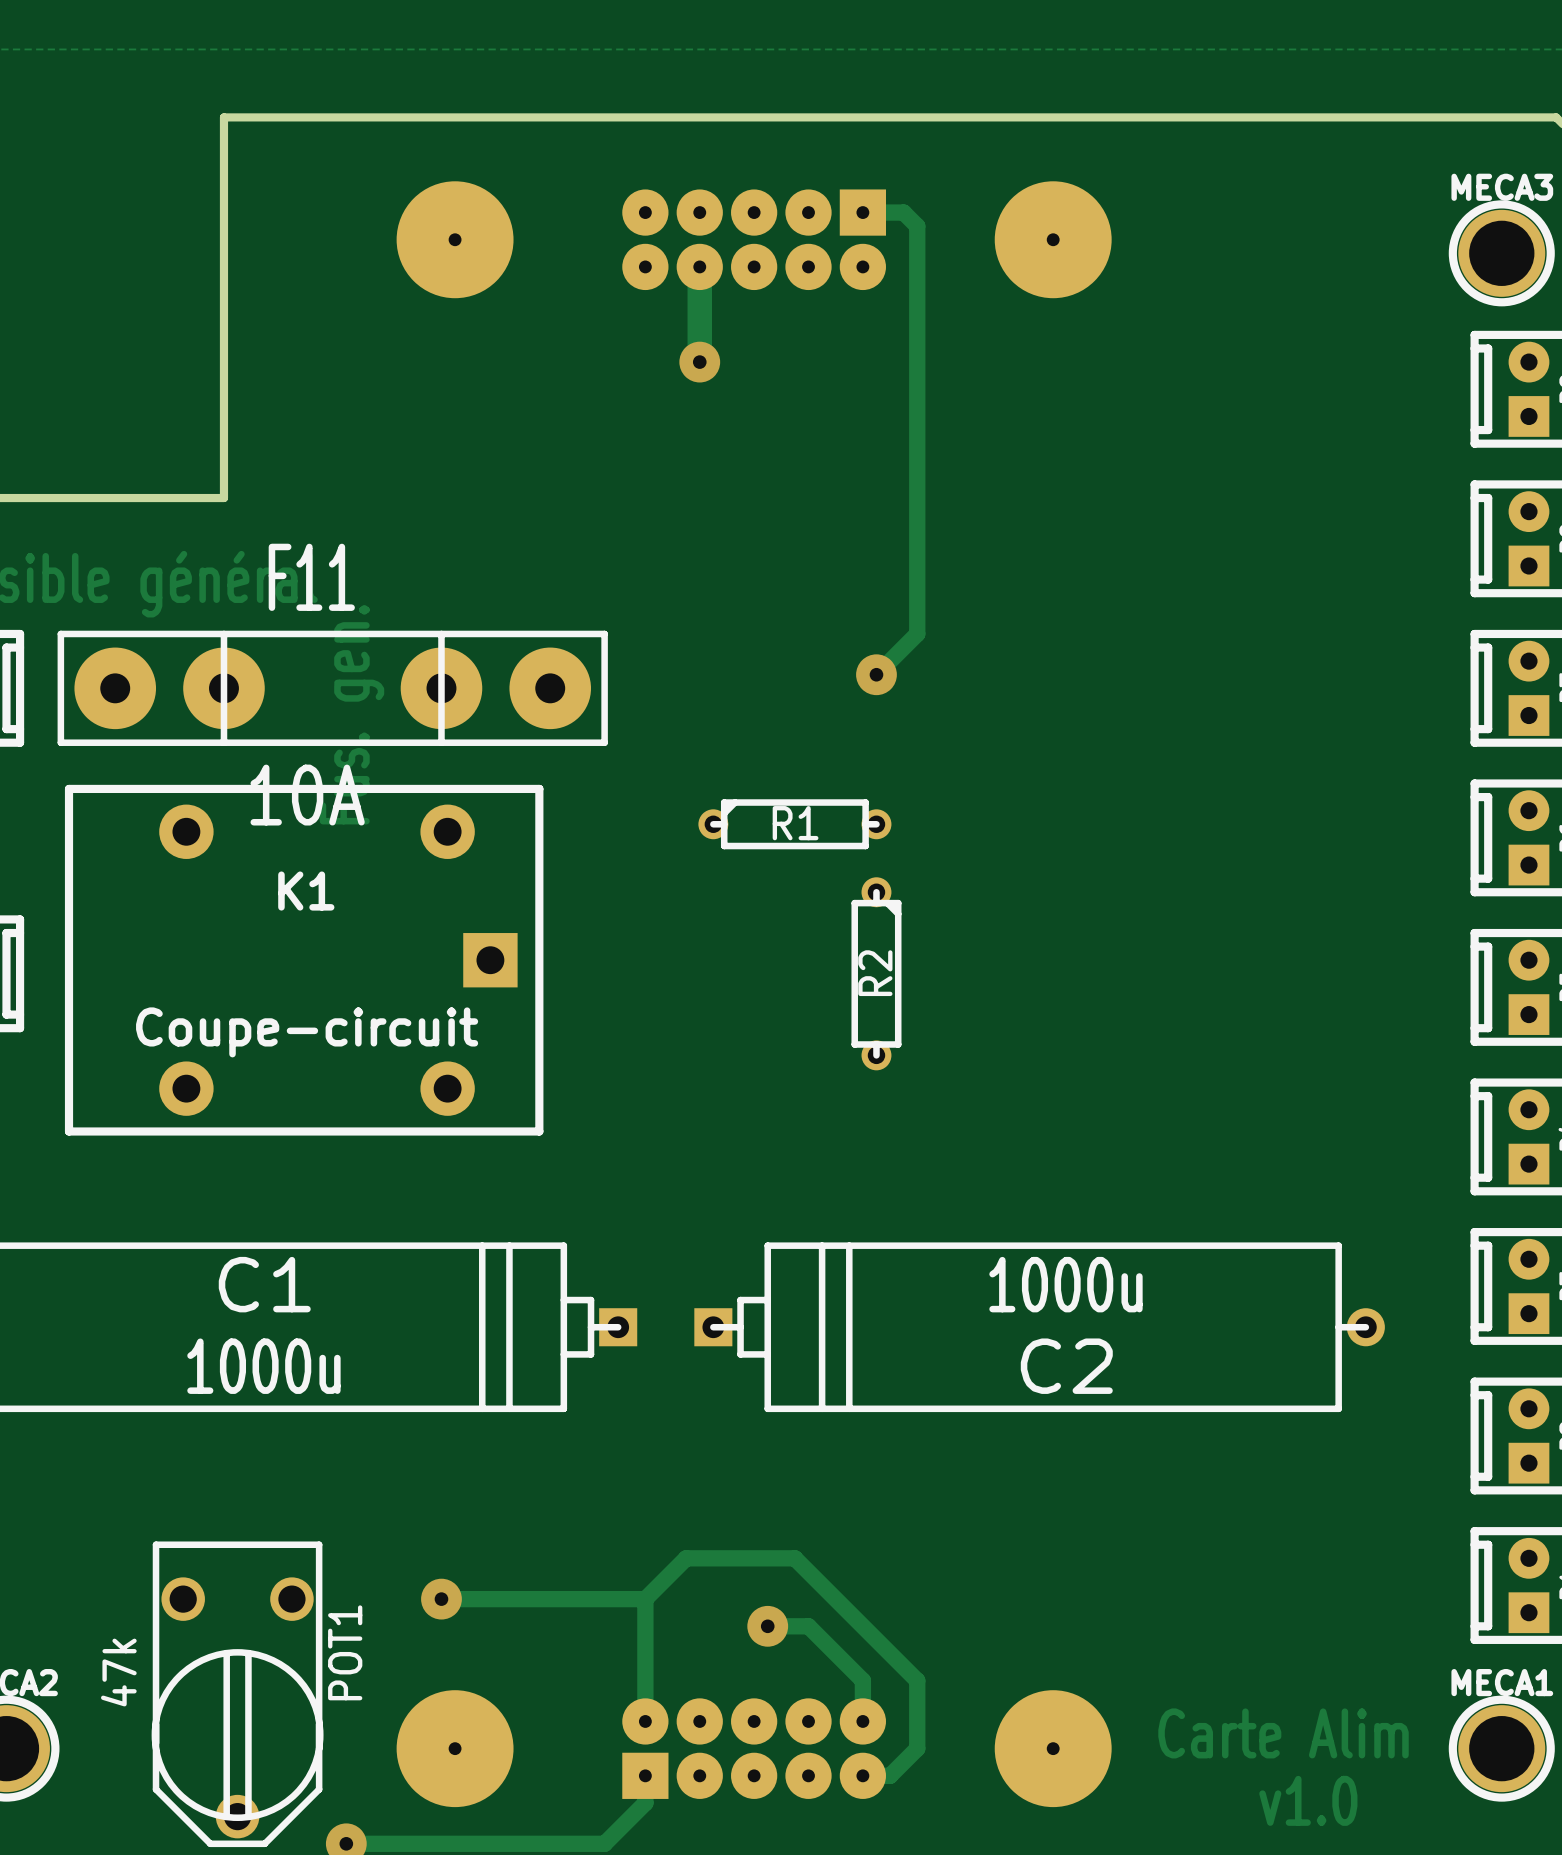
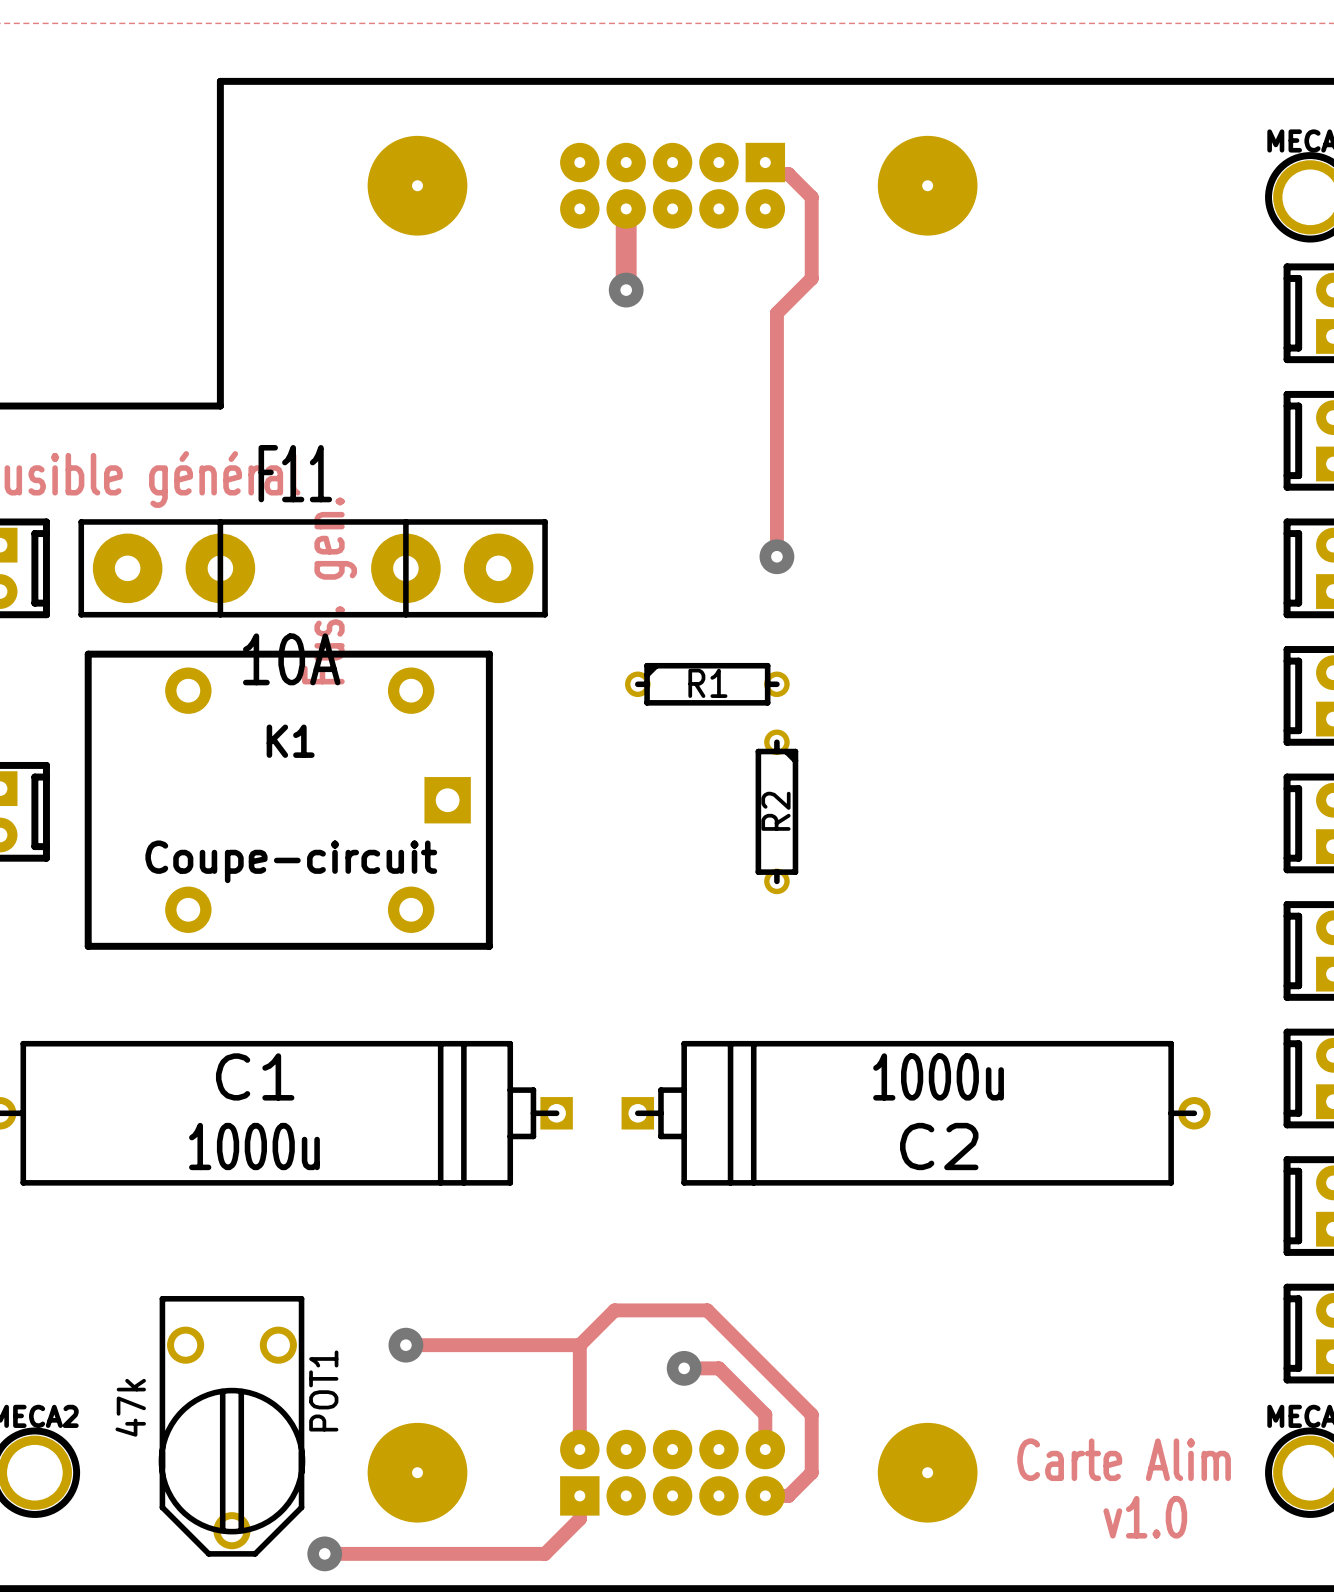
track: (862, 212) (903, 212) (917, 226) (917, 253) -> (765, 174) (788, 174) (811, 197)
track: (917, 348) (917, 633) (876, 674) -> (811, 278) (776, 313) (776, 556)

